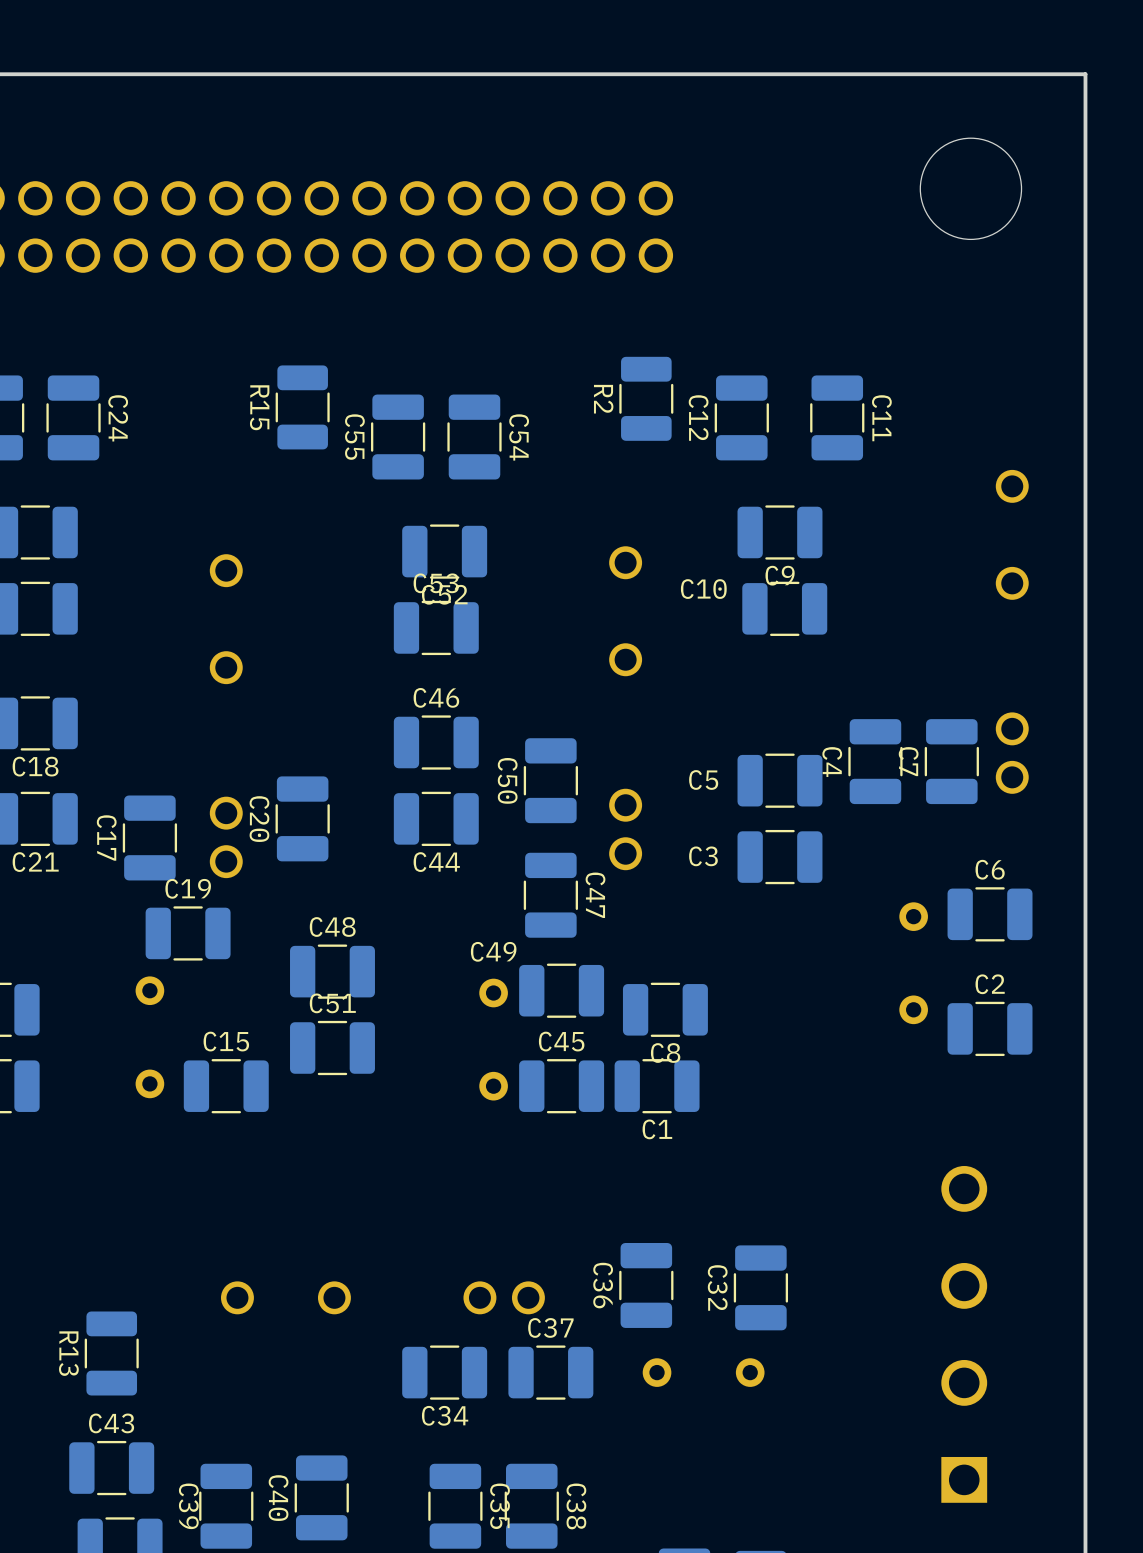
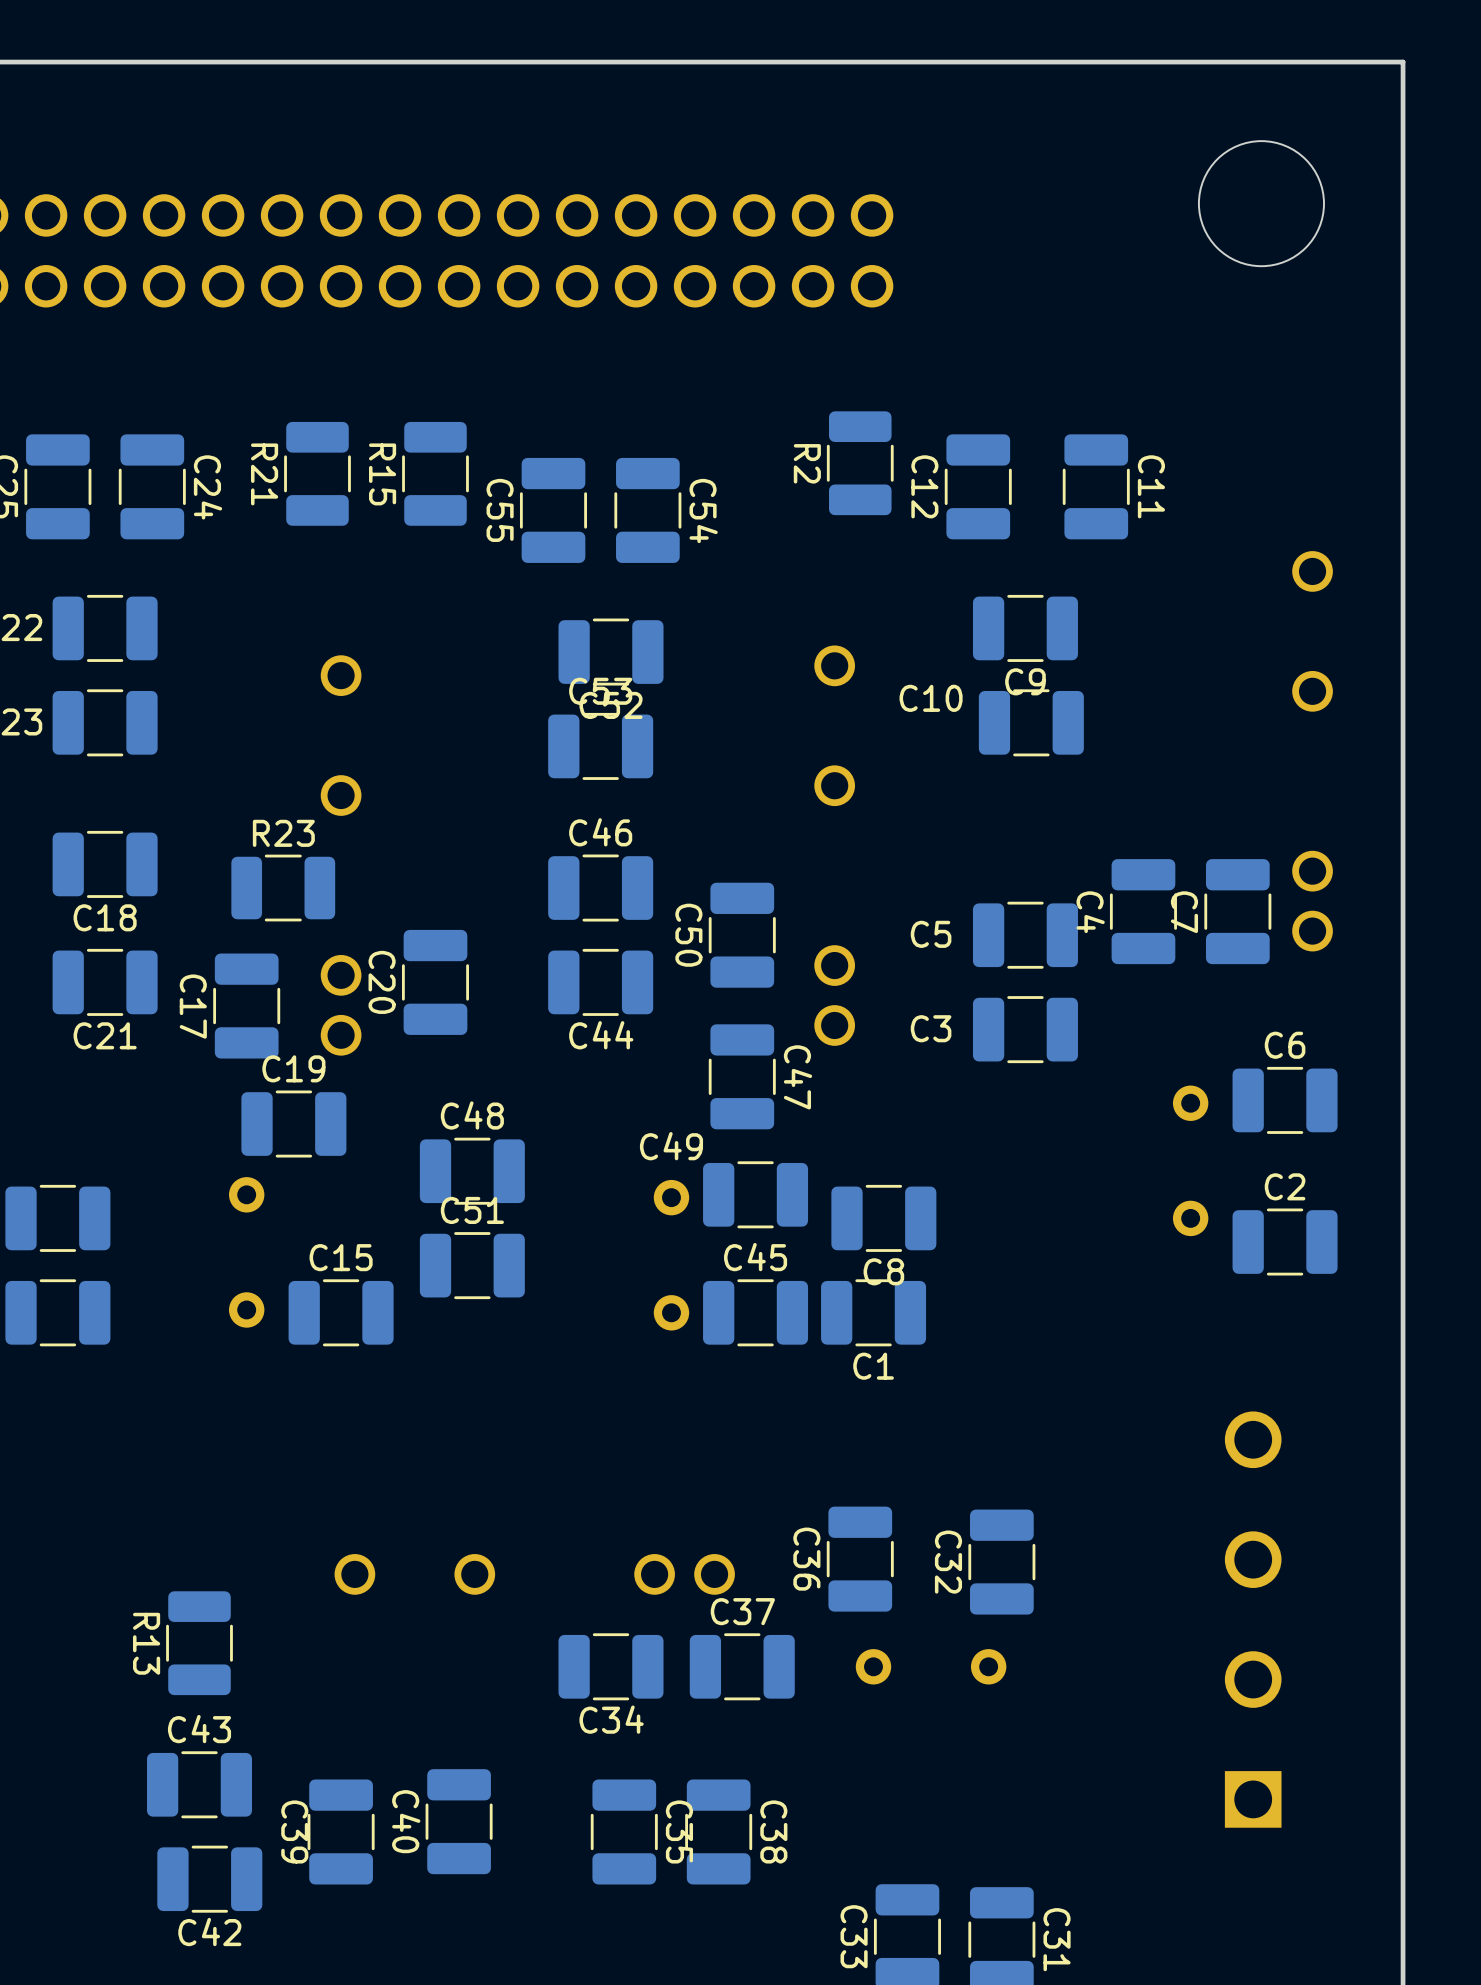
R21: none -> (317, 473)
R23: none -> (283, 888)

